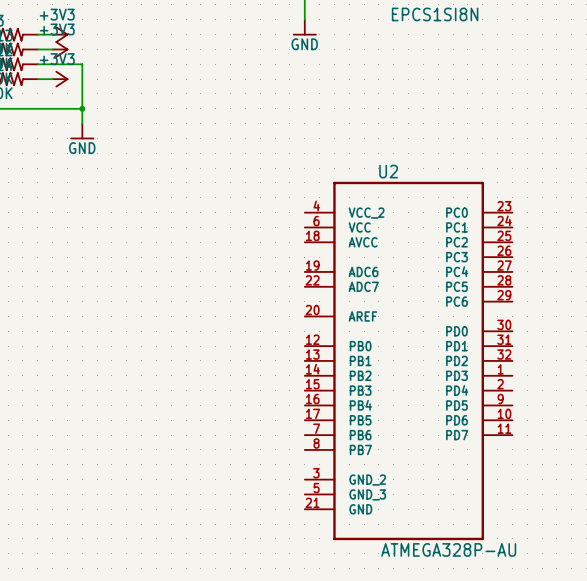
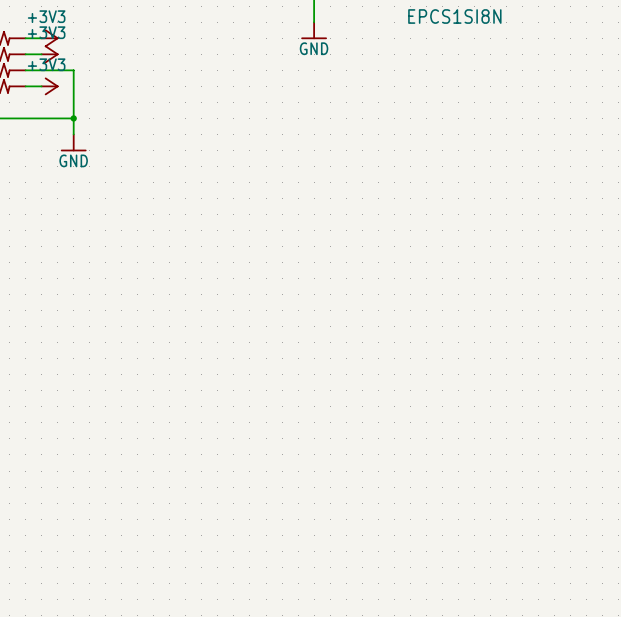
U2: ATMEGA328P-AU (408, 360) -> none

